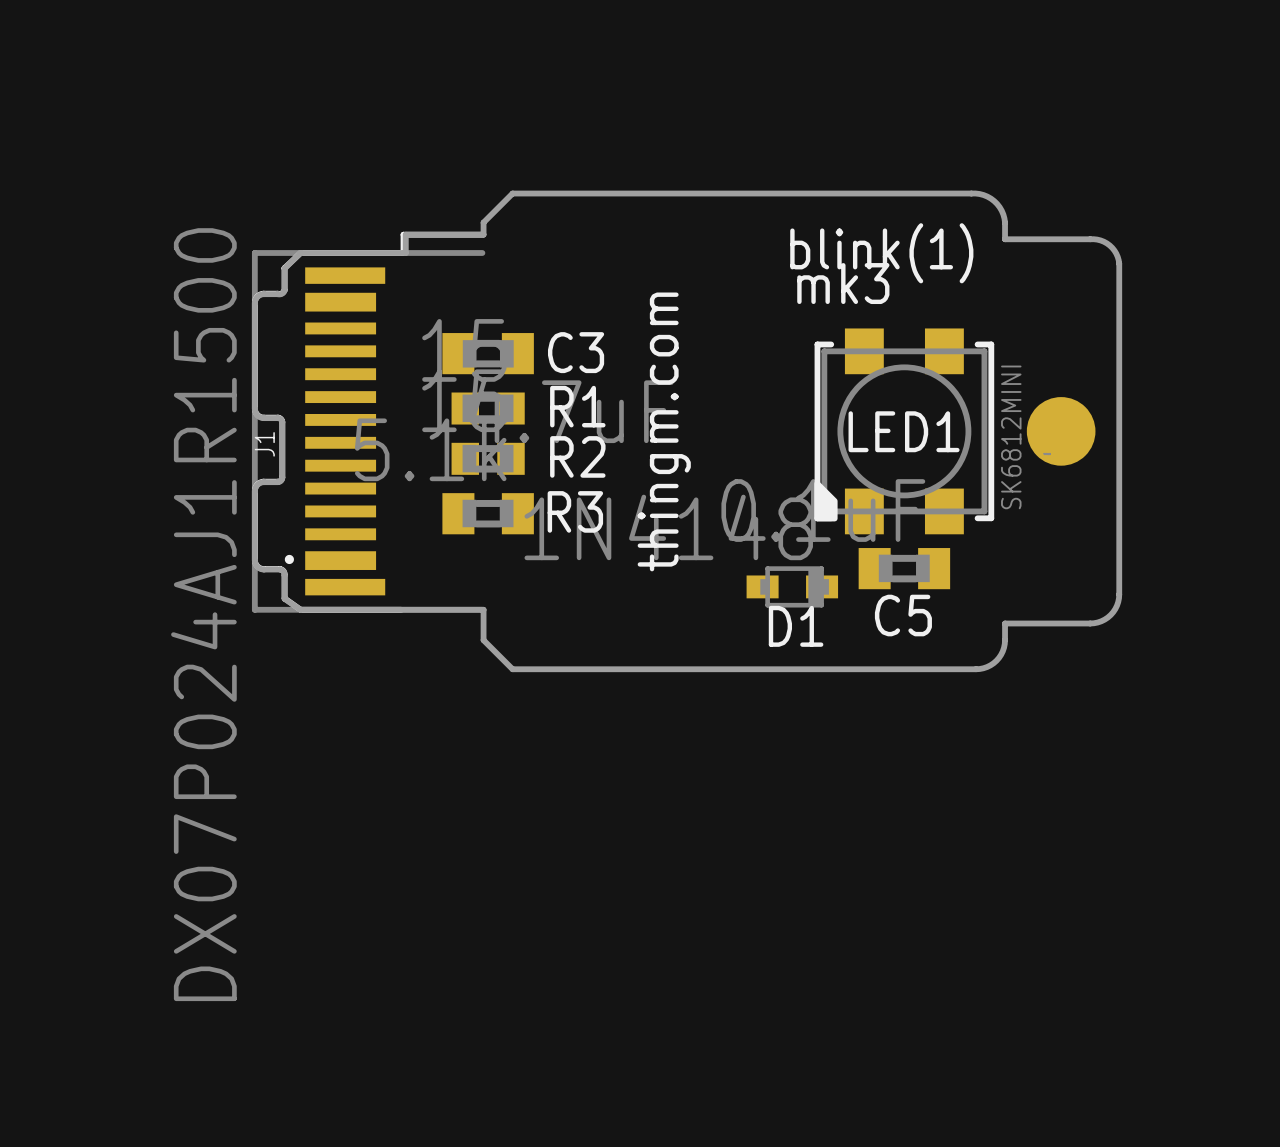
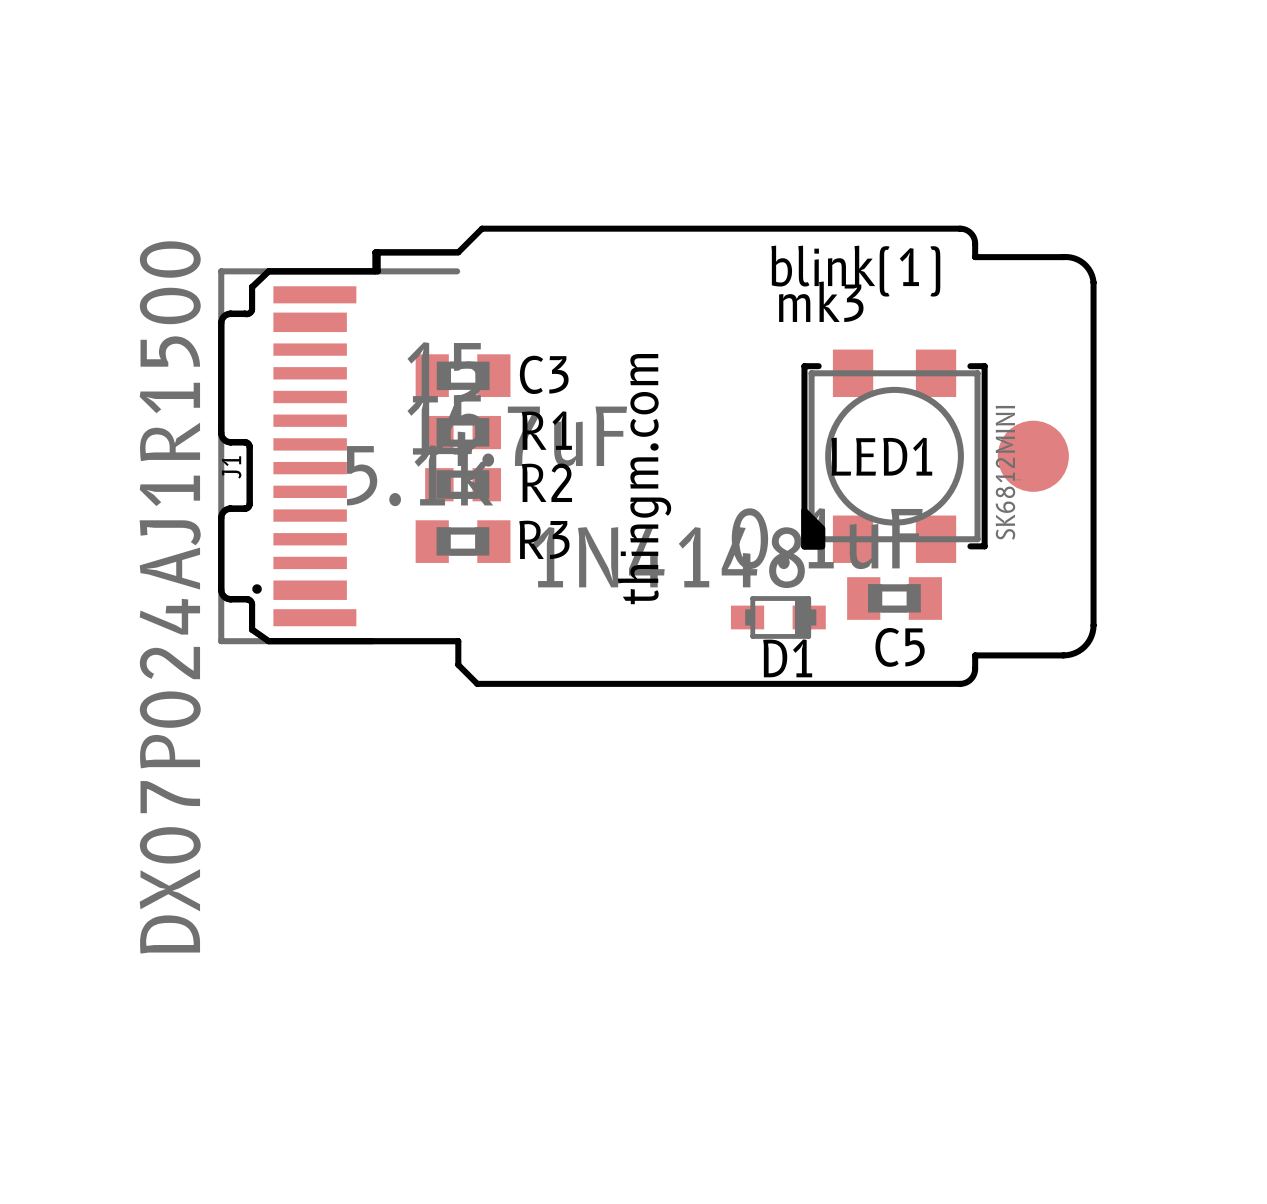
board edge: (483, 234) (483, 222) (512, 193) (975, 193) (990, 198) (999, 207) (1004, 218) (1005, 239) -> (458, 252) (482, 228) (960, 228) (967, 230) (973, 236) (975, 257) (998, 257)
board edge: (1067, 239) (1093, 239) (1103, 241) (1114, 250) (1119, 263) (1119, 598) (1113, 612) (1101, 621) (1067, 623) -> (1063, 257) (1074, 258) (1083, 263) (1090, 272) (1093, 282) (1093, 629) (1089, 640) (1081, 649) (1071, 654) (1063, 655)
part position: (1061, 431) -> (1033, 456)
board edge: (1005, 623) (1004, 643) (1001, 654) (990, 665) (975, 669) (512, 669) (483, 640) (483, 632) -> (998, 655) (975, 655) (973, 676) (967, 681) (960, 683) (477, 683) (458, 664)

